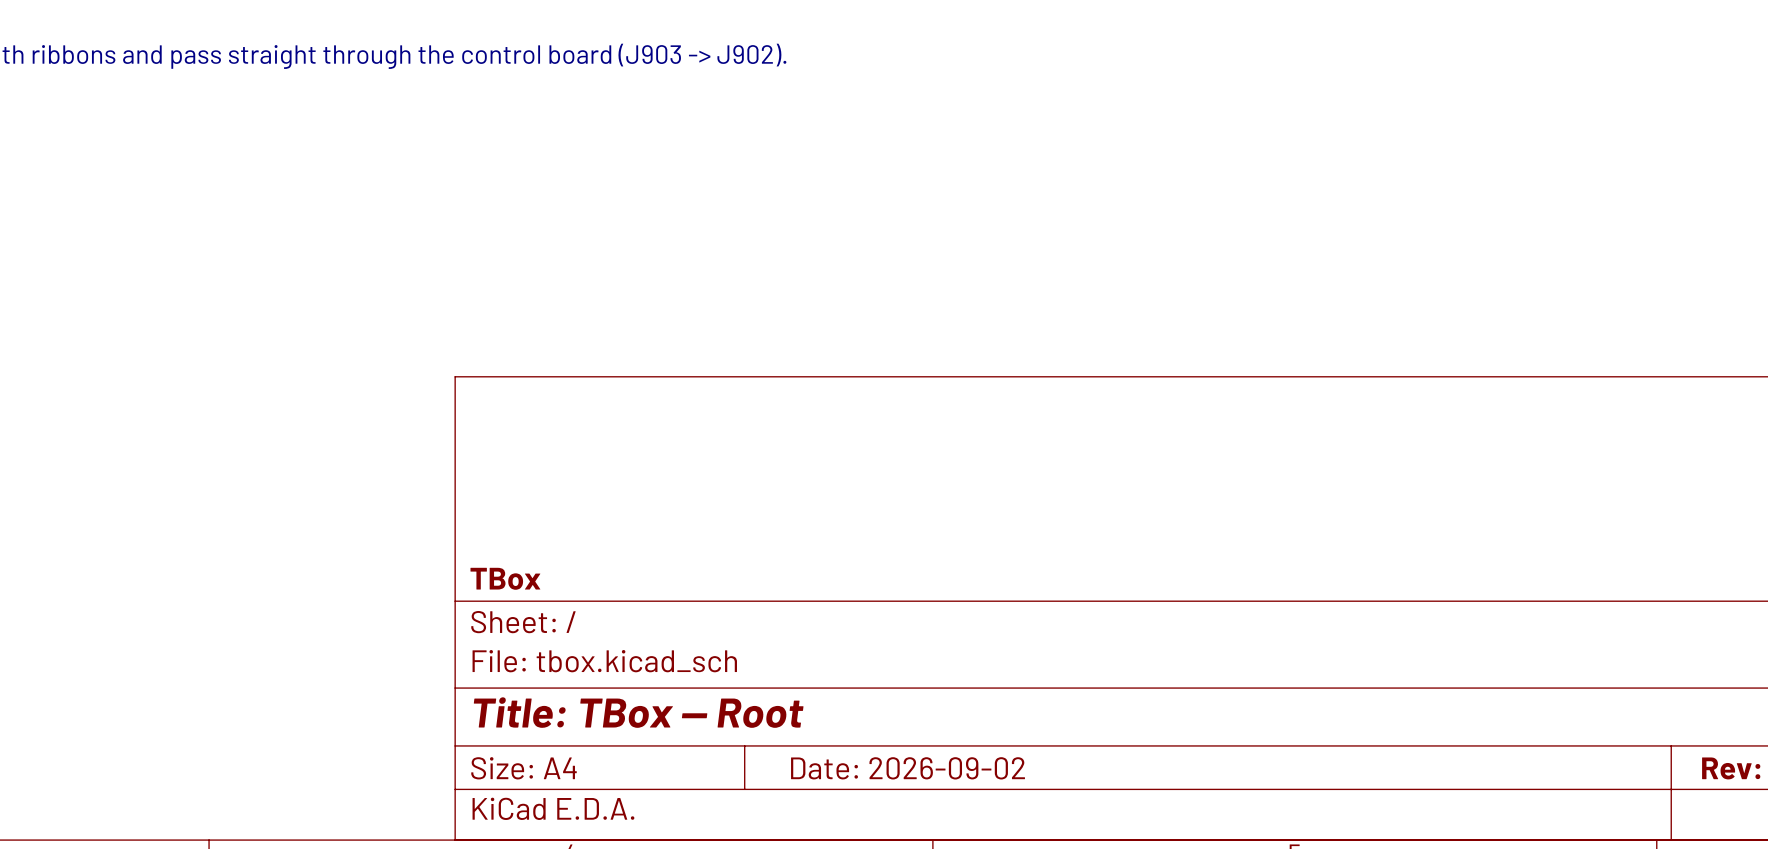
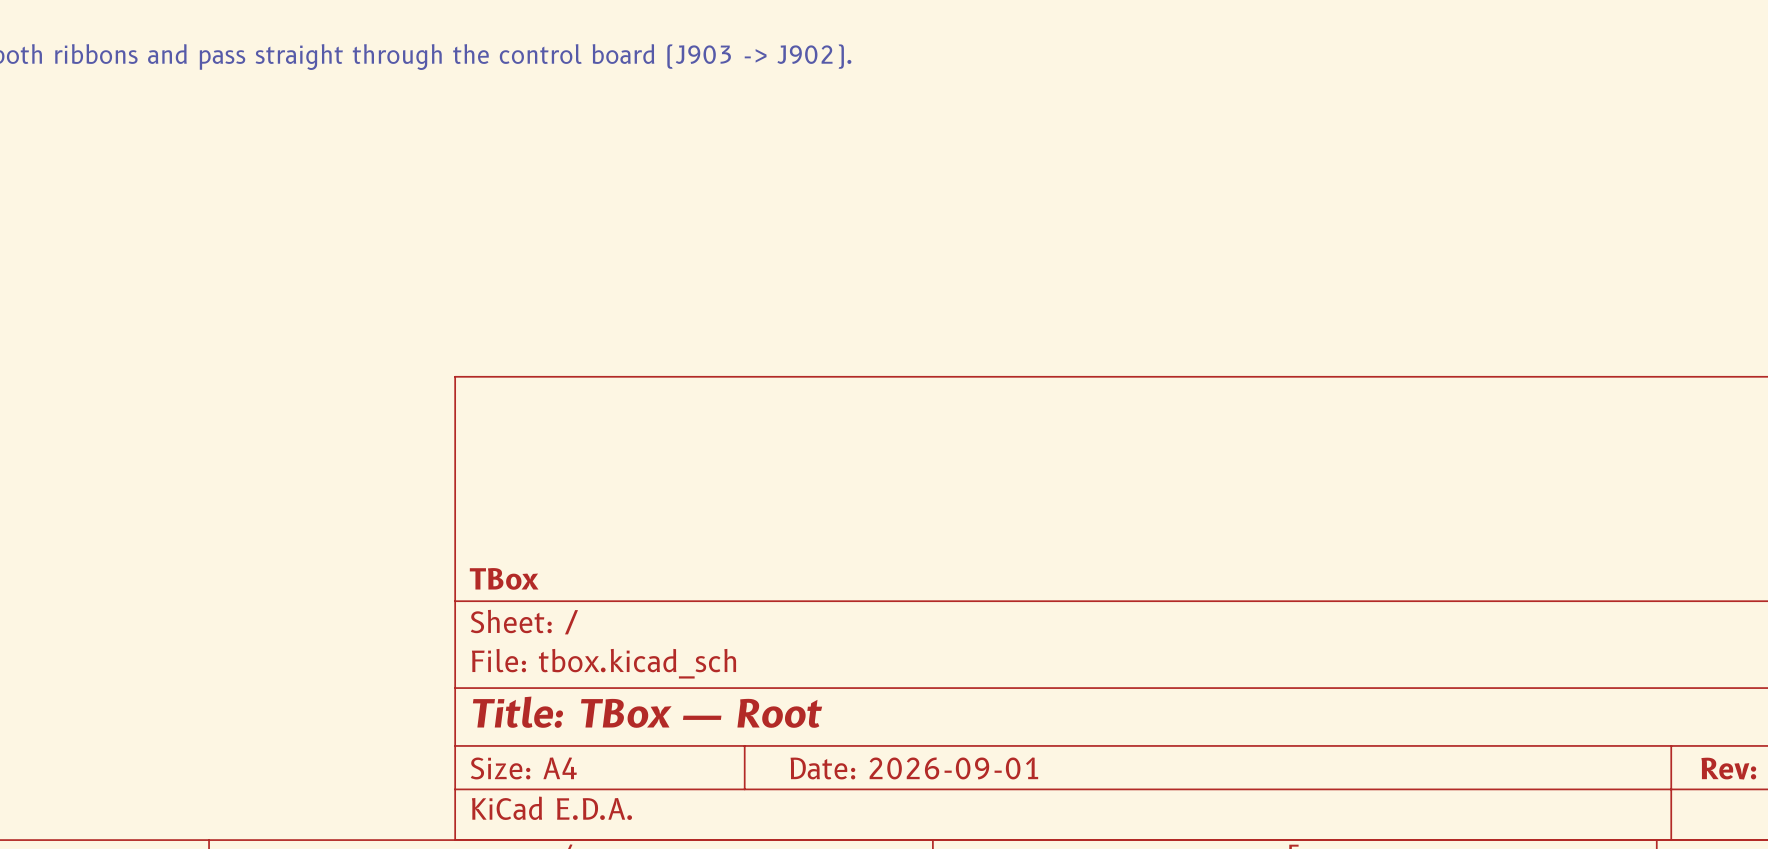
title block: Date: 2026-09-02 (908, 768) -> Date: 2026-09-01 (914, 768)

